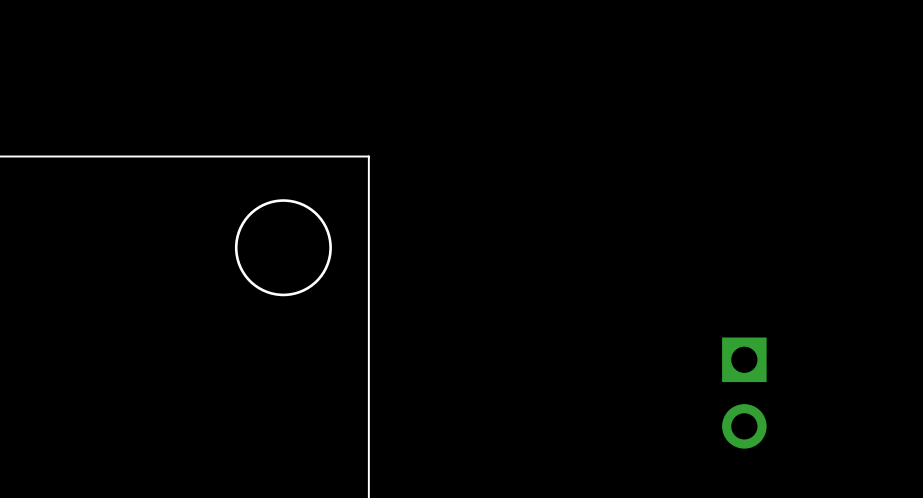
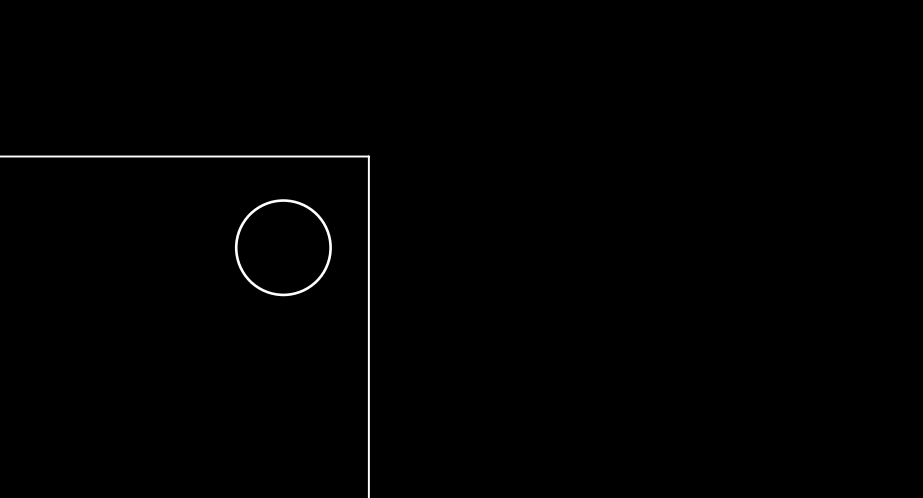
part: (744, 393) -> none

